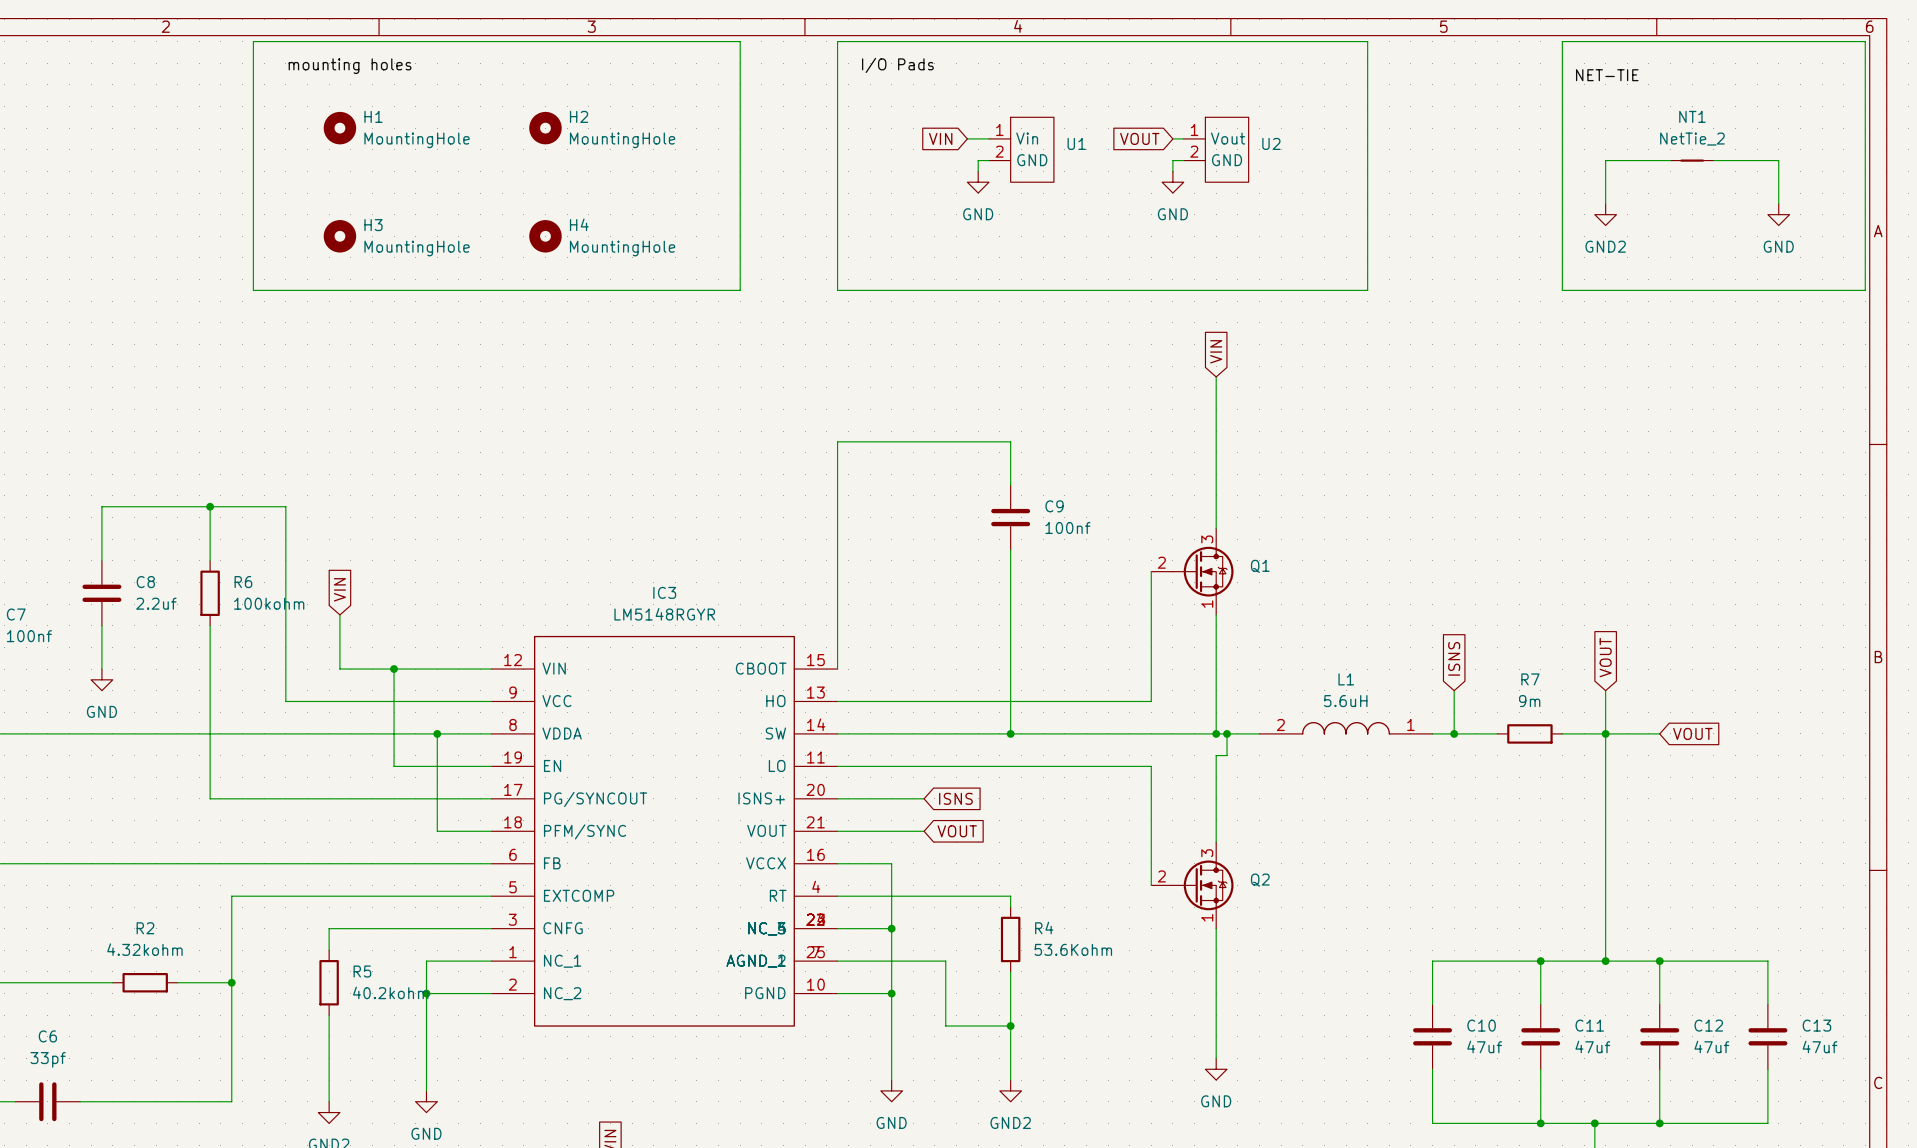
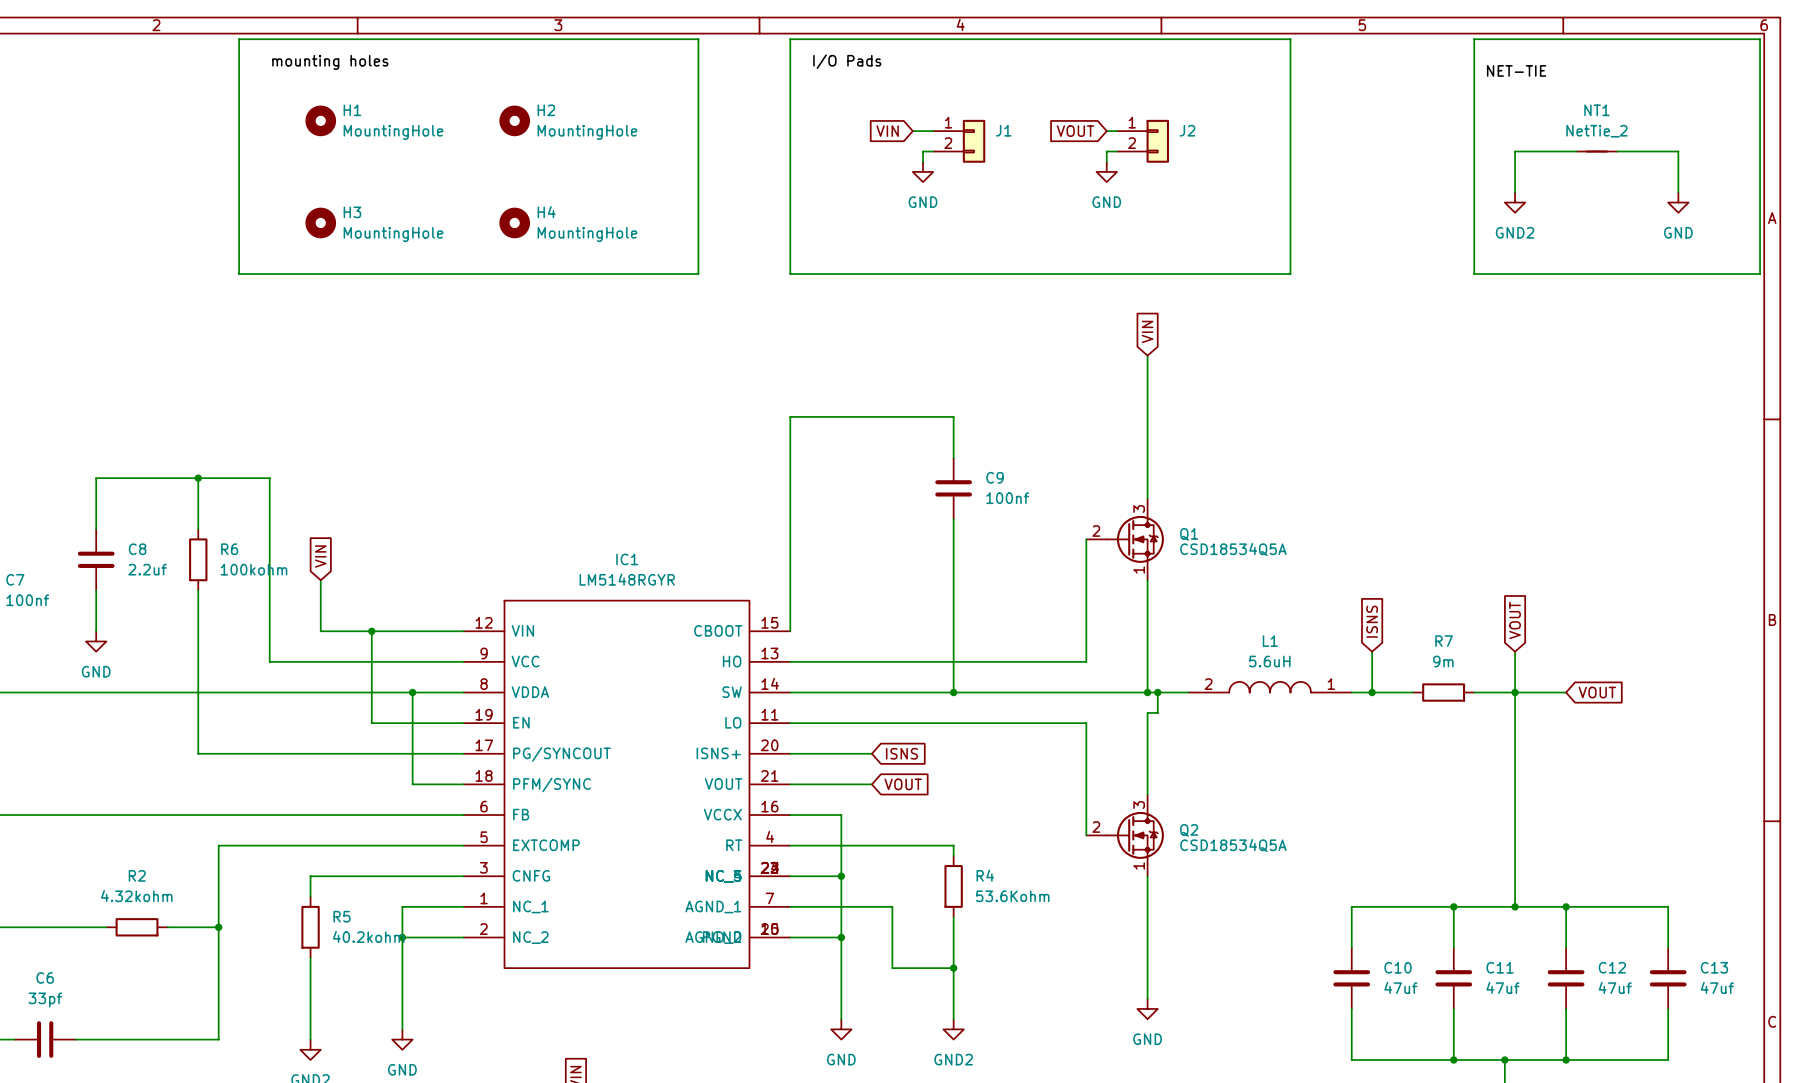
J1: none -> (959, 141)
U1: (1021, 149) -> none
J2: none -> (1142, 141)
U2: (1216, 149) -> none
Q1 value: none -> CSD18534Q5A (1233, 549)
IC3 name: IC3 (664, 592) -> IC1 (627, 559)
IC3 symbol: [491, 635, 838, 1027] -> [463, 600, 791, 969]
Q2 value: none -> CSD18534Q5A (1233, 845)

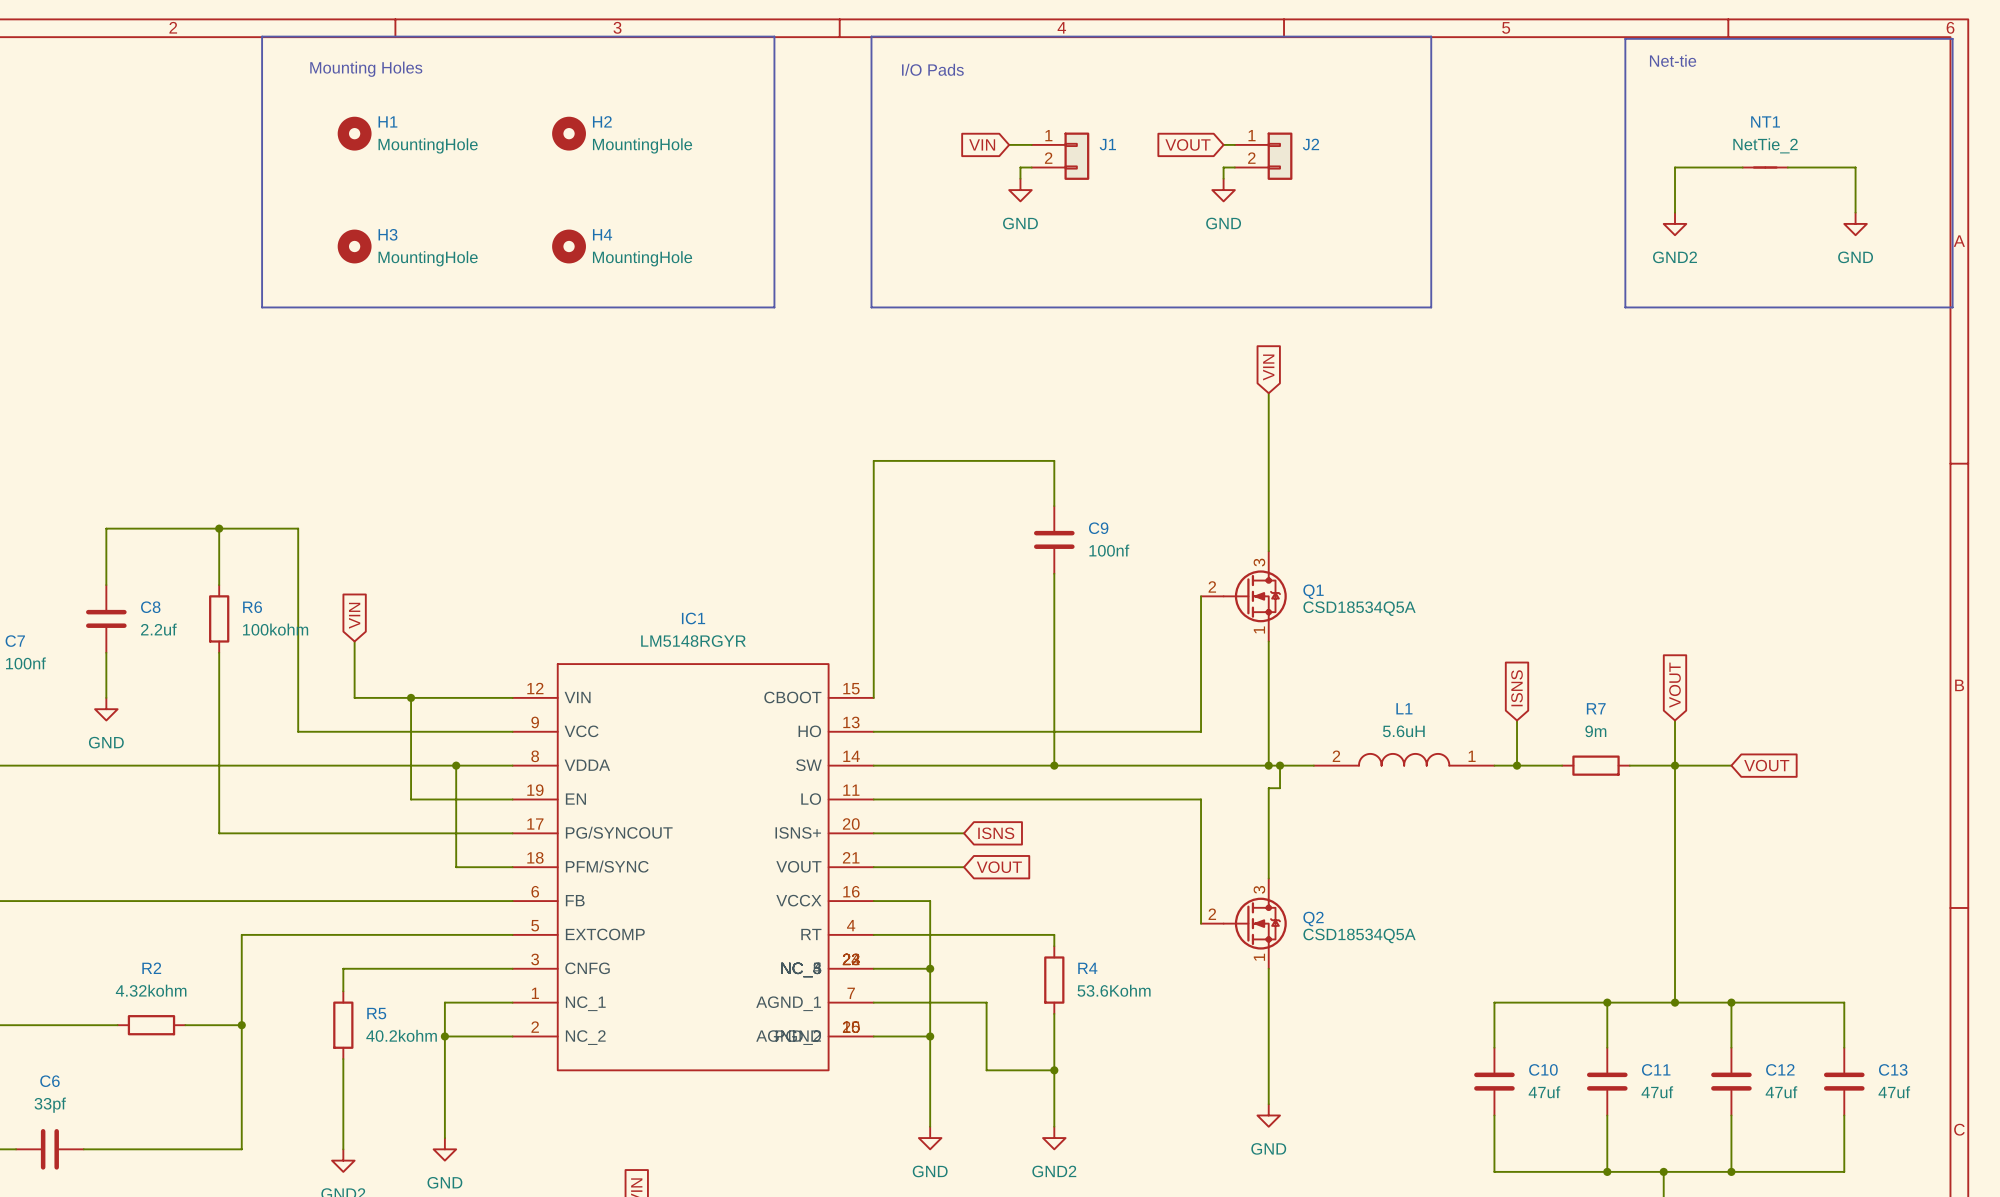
line: none -> (262, 36) (774, 36) (774, 307) (262, 307) (262, 36)
line: none -> (871, 36) (1431, 36) (1431, 307) (871, 307) (871, 36)
line: none -> (1625, 38) (1952, 38) (1952, 307) (1625, 307) (1625, 38)
wire: (239, 39) (698, 39) (698, 274) (239, 274) (239, 39) -> none
wire: (790, 39) (1290, 39) (1290, 274) (790, 274) (790, 39) -> none
wire: (1474, 39) (1474, 274) (1760, 274) (1760, 39) (1474, 39) -> none
text: none -> Net-tie (1673, 60)
label: I/O Pads (847, 61) -> none
label: mounting holes (330, 62) -> none
text: none -> Mounting Holes (366, 69)
text: none -> I/O Pads (932, 69)
label: NET-TIE (1516, 70) -> none

